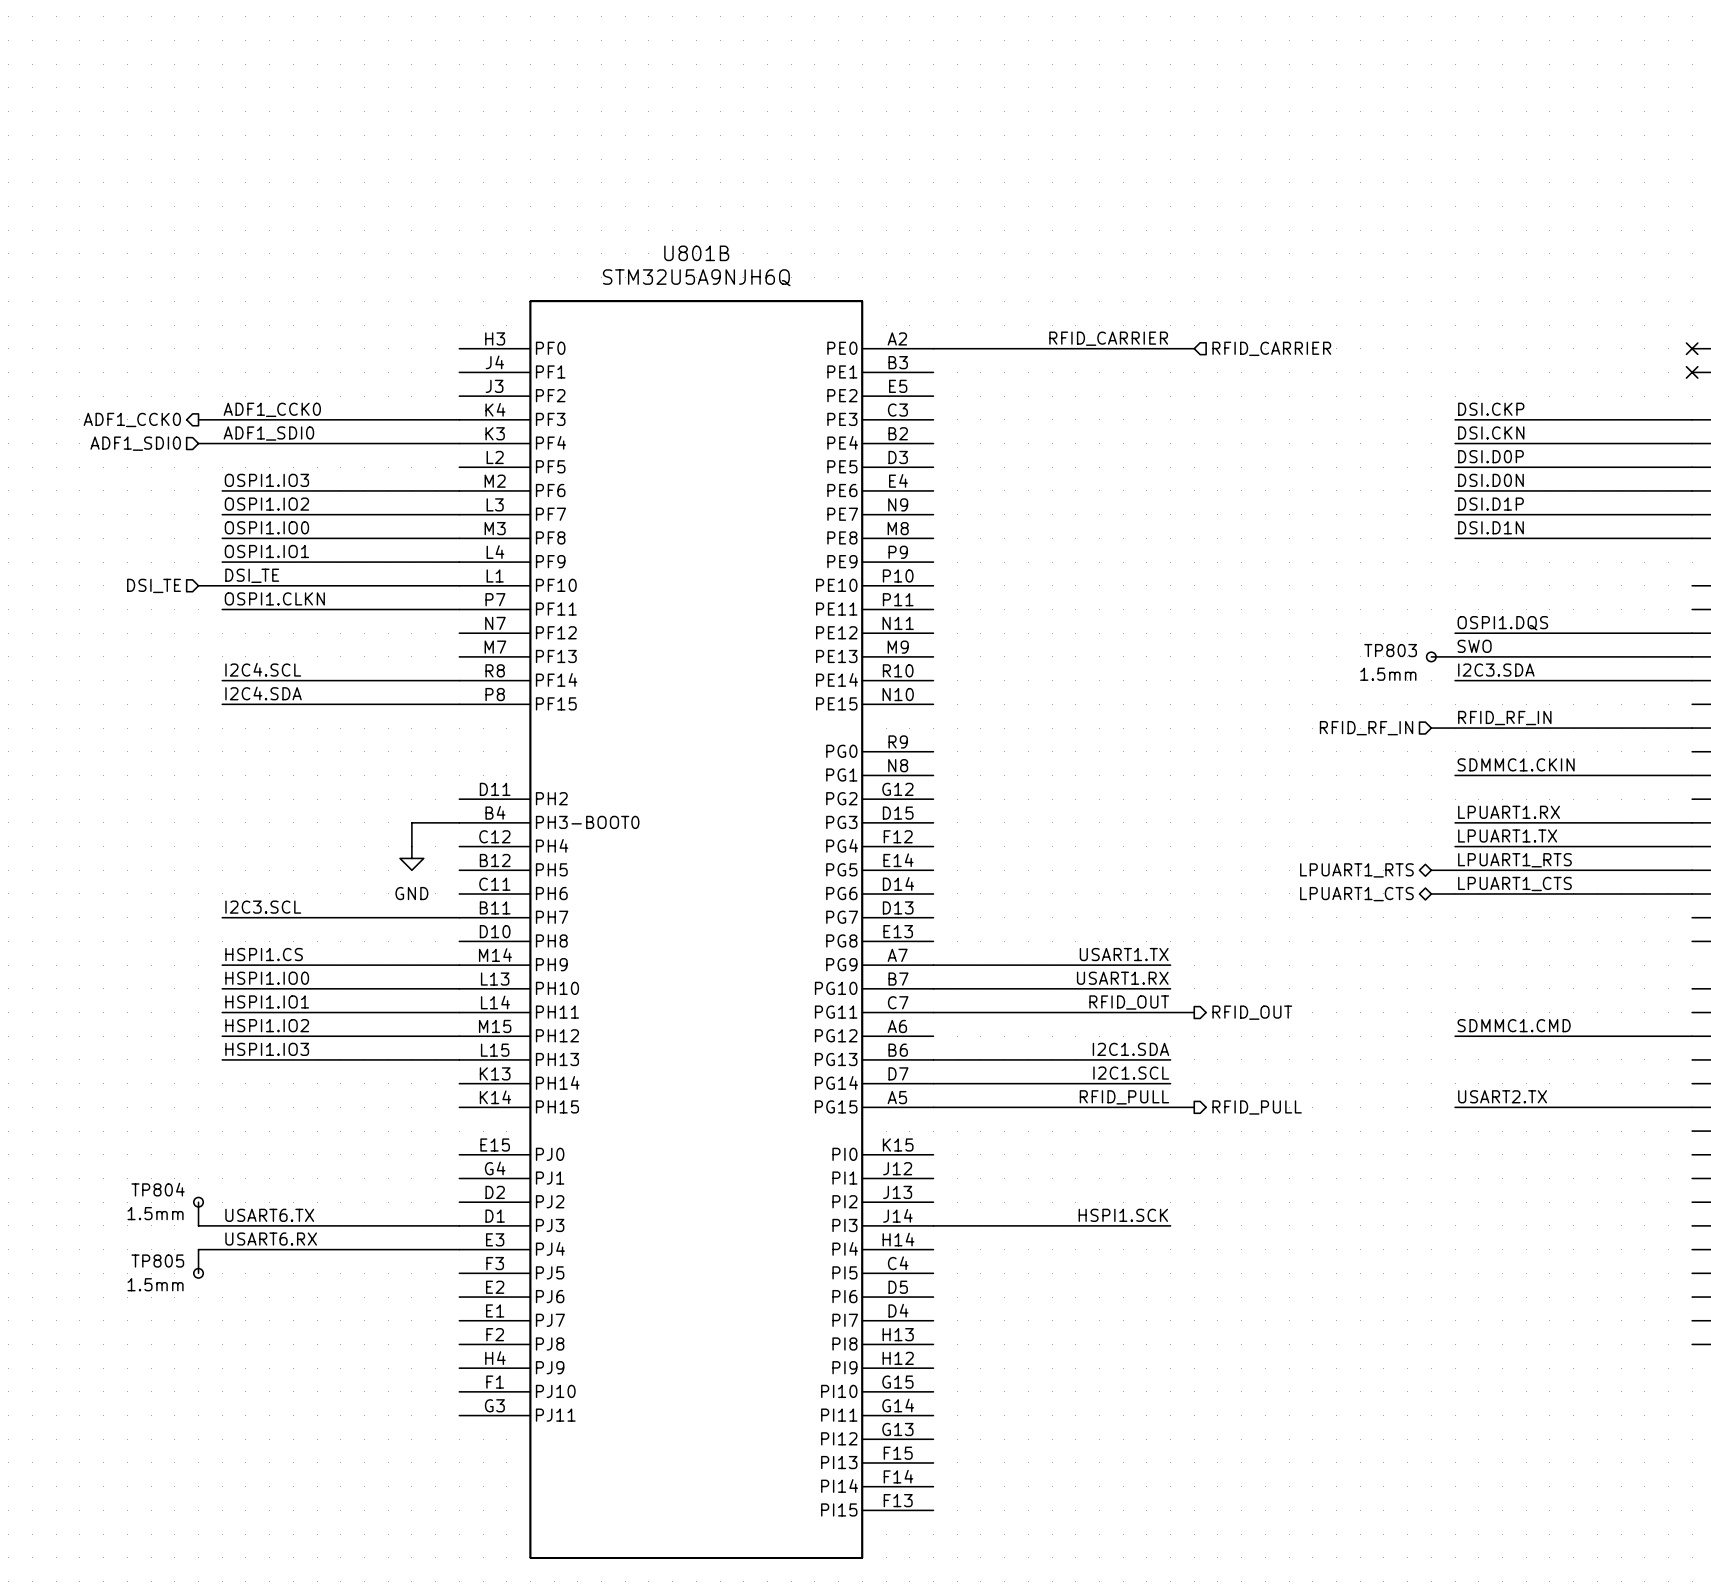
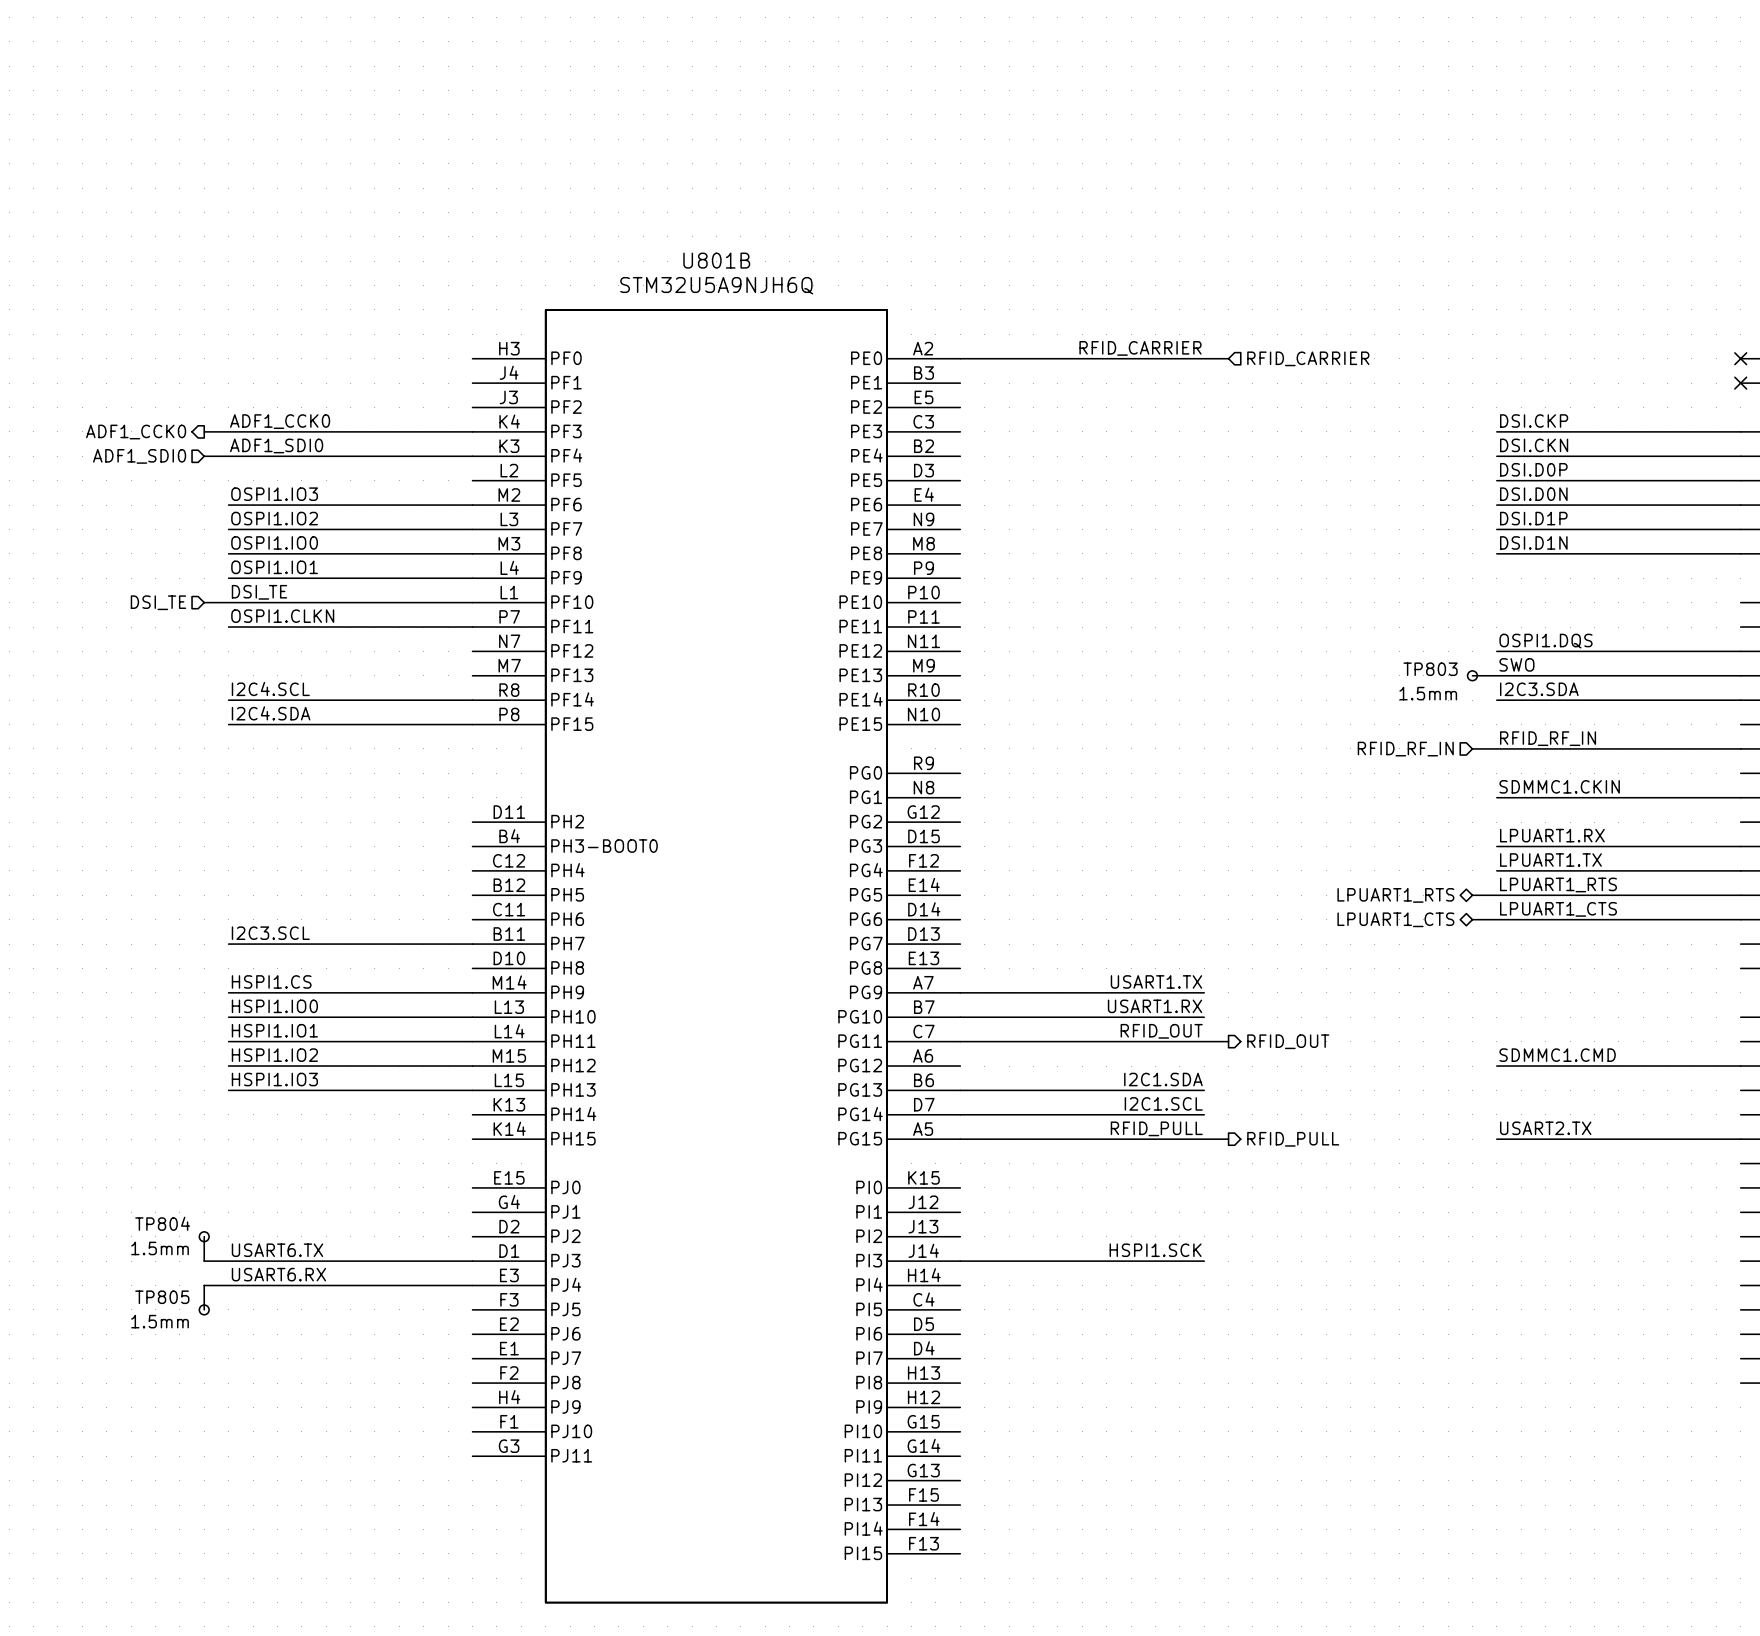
wire: (459, 822) (411, 822) (411, 846) -> none
power symbol: GND (411, 858) -> none

